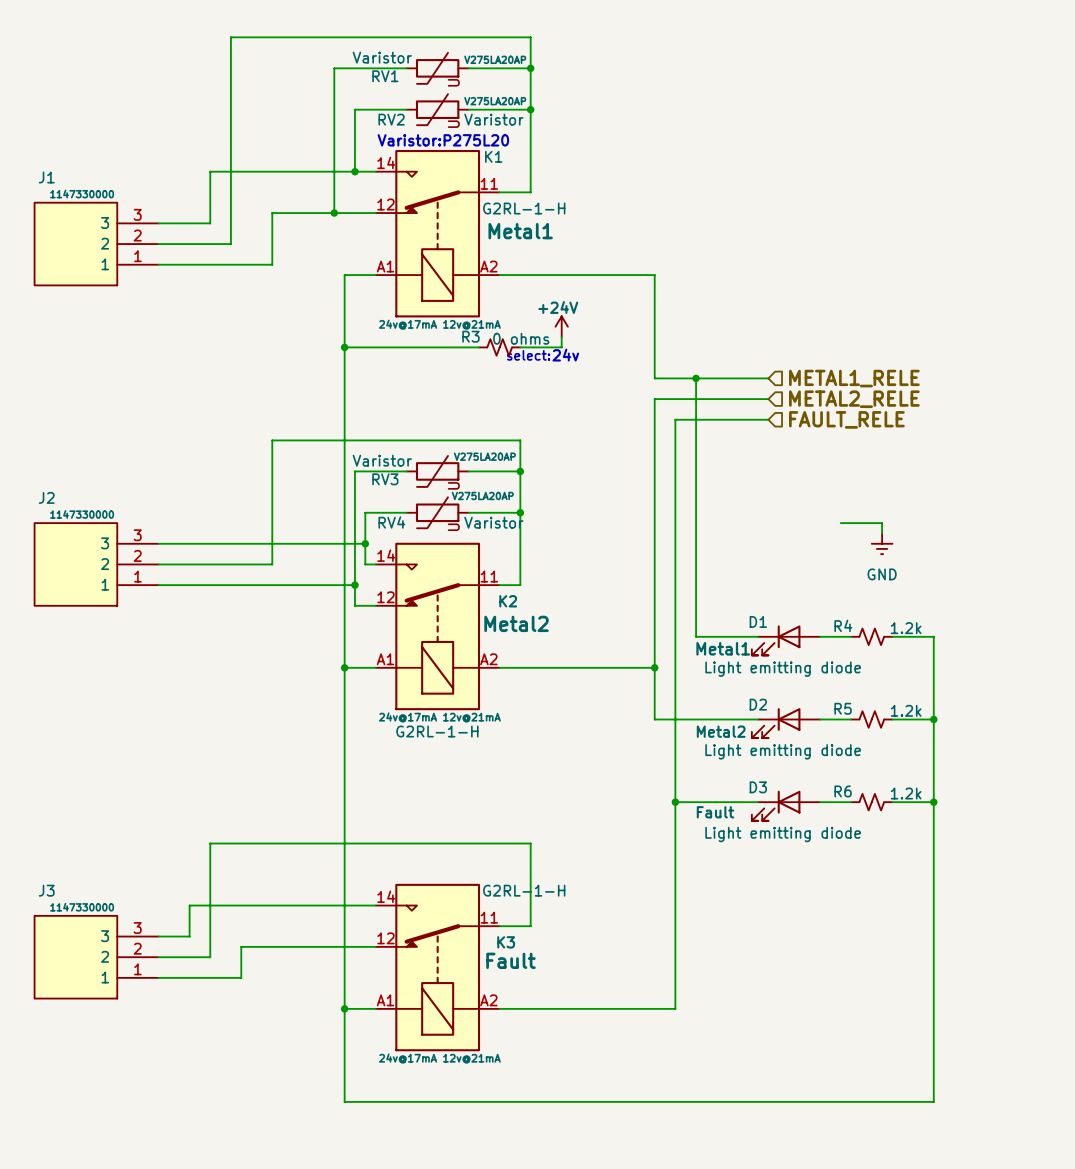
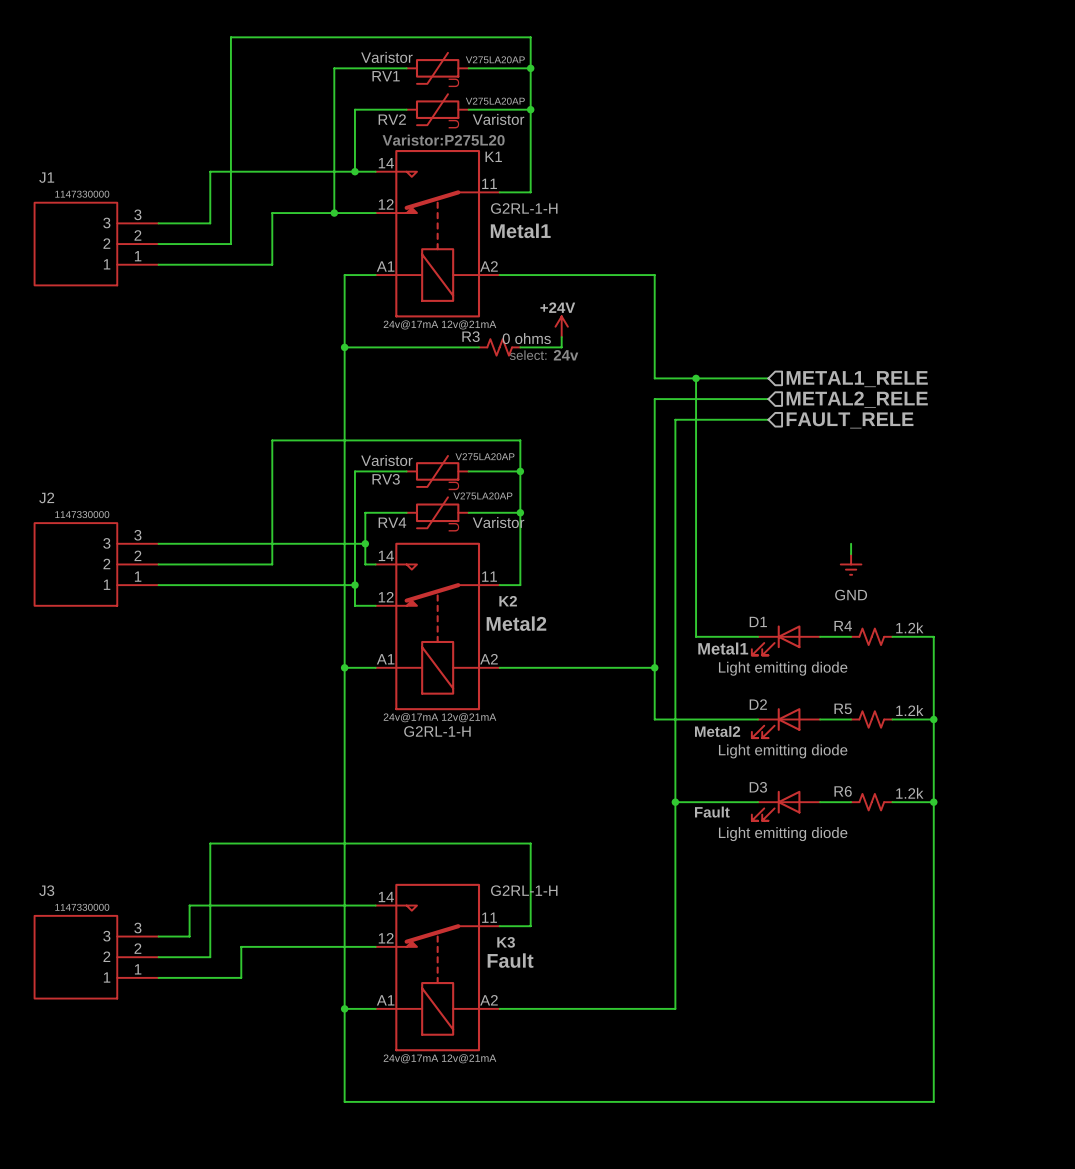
wire: (840, 523) (882, 523) (882, 533) -> none
wire: none -> (851, 543) (851, 554)
power symbol position: GND (882, 543) -> GND (851, 564)

